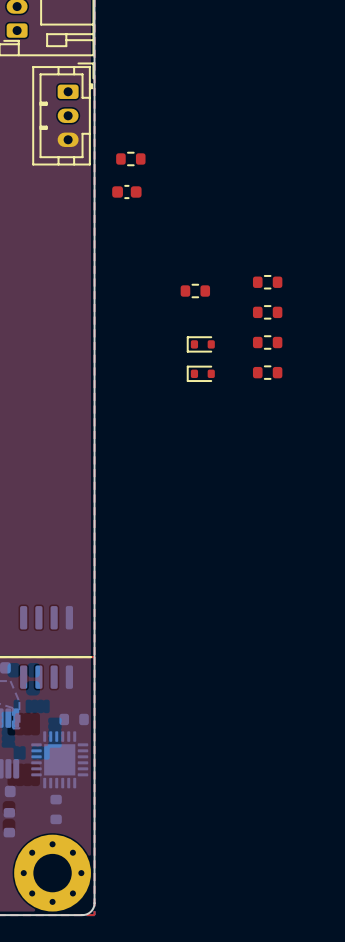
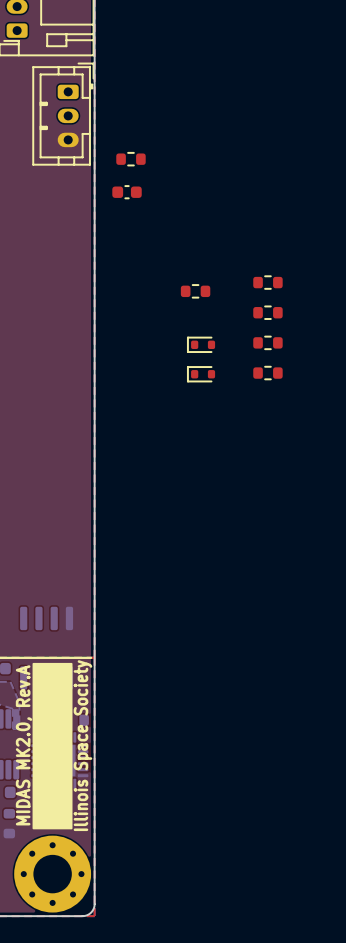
drawing: none -> [32, 662, 73, 830]
text: none -> MIDAS MK2.0, Rev.A (24, 745)
text: none -> Illinois Space Society (82, 745)

